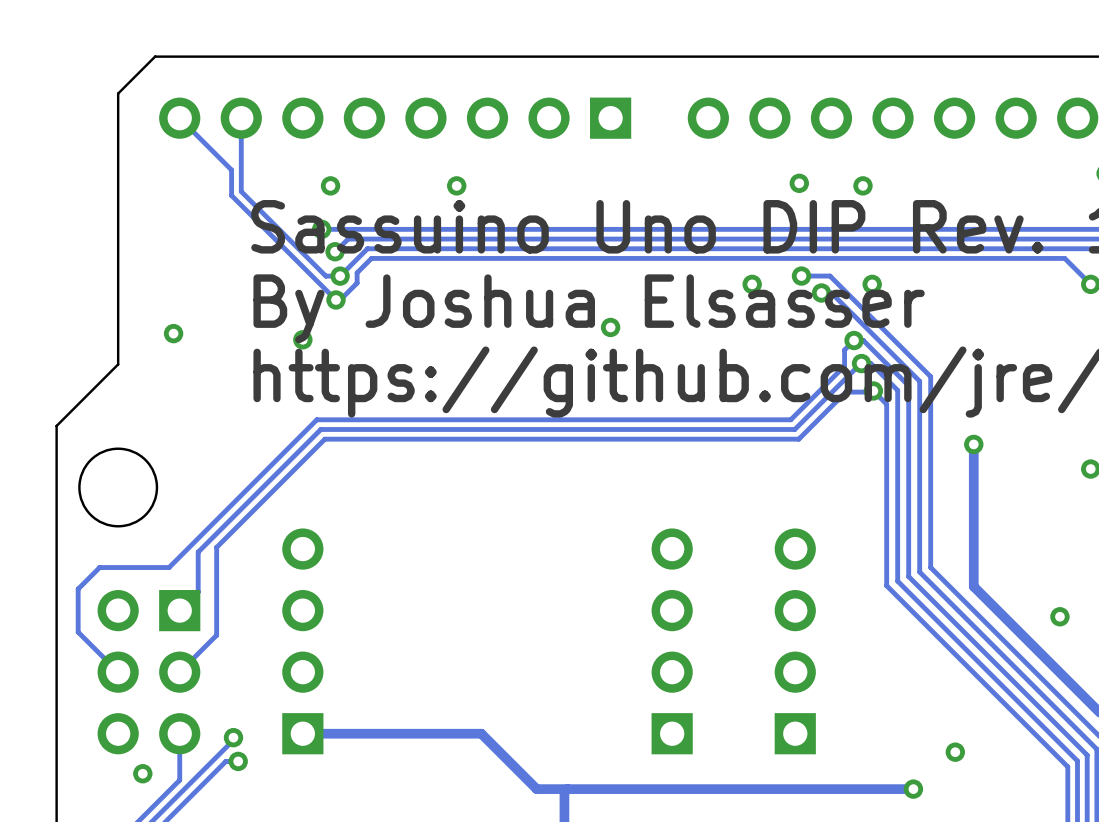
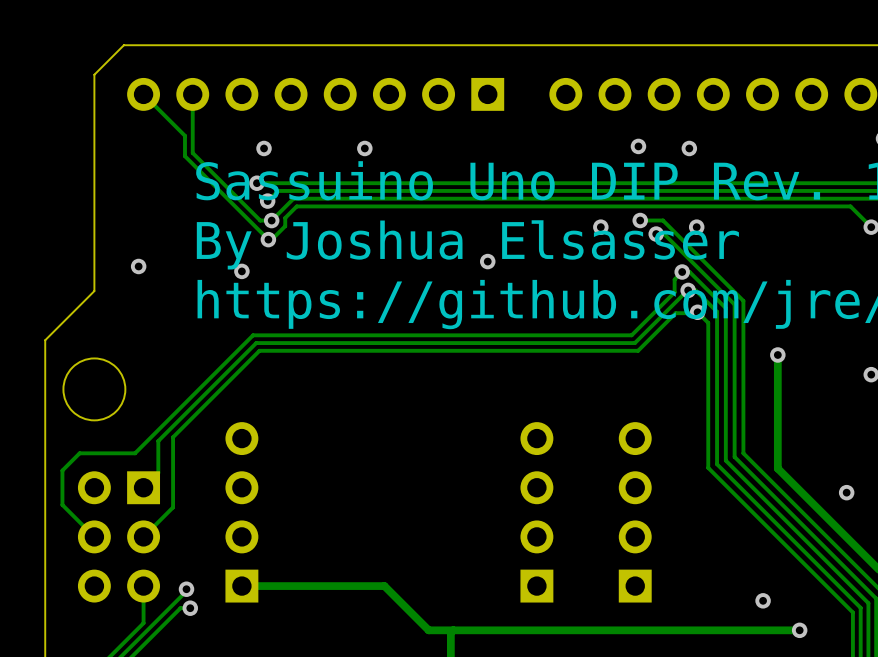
via: (142, 773) -> none
via position: (913, 789) -> (799, 630)
track: none -> (799, 630) (729, 630)

